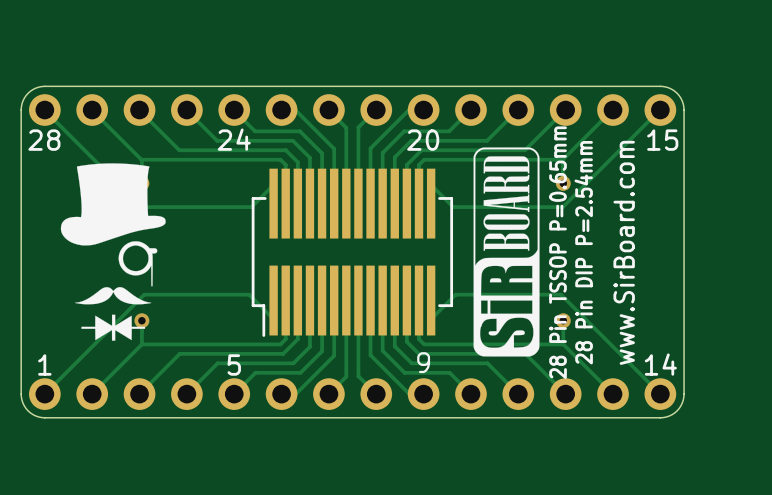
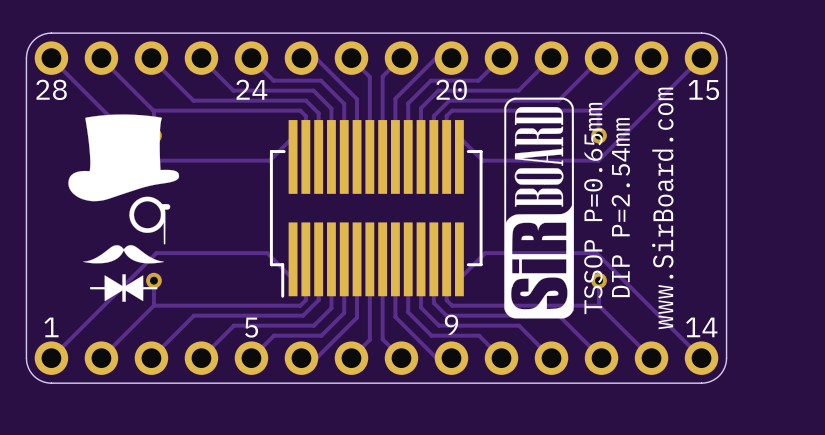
text: 28 Pin TSSOP P=0.65mm (558, 252) -> TSSOP P=0.65mm (593, 208)
text: 28 Pin DIP P=2.54mm (583, 252) -> DIP P=2.54mm (620, 207)

